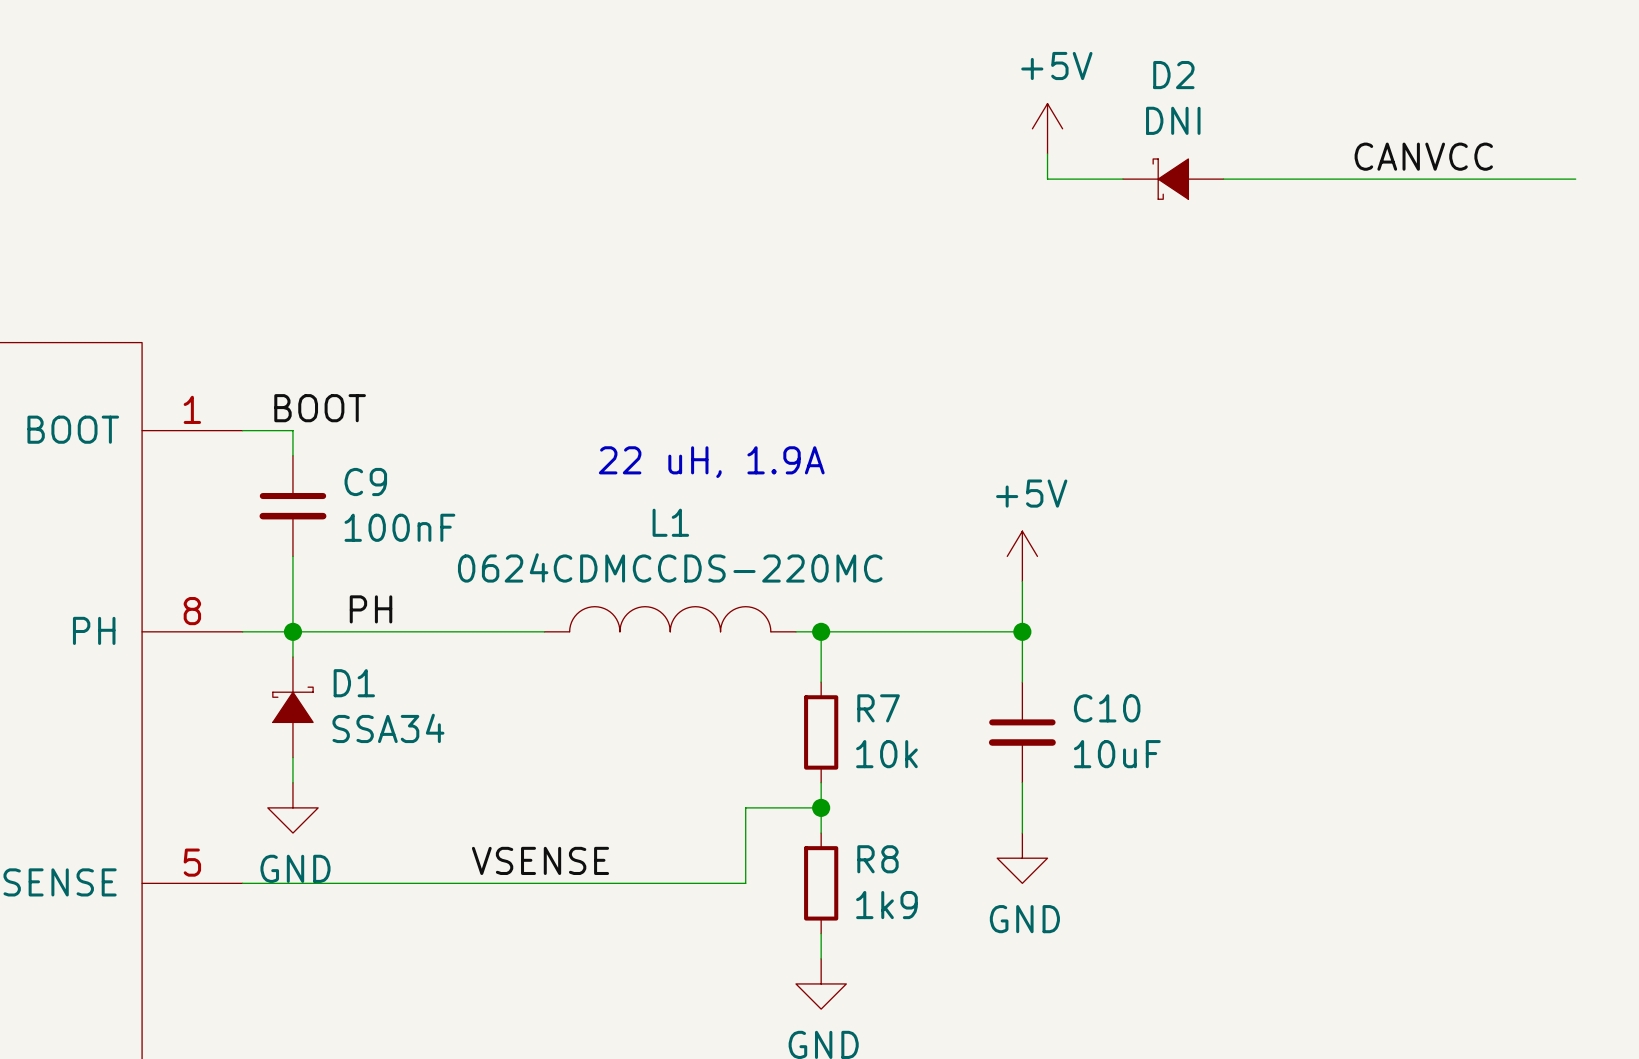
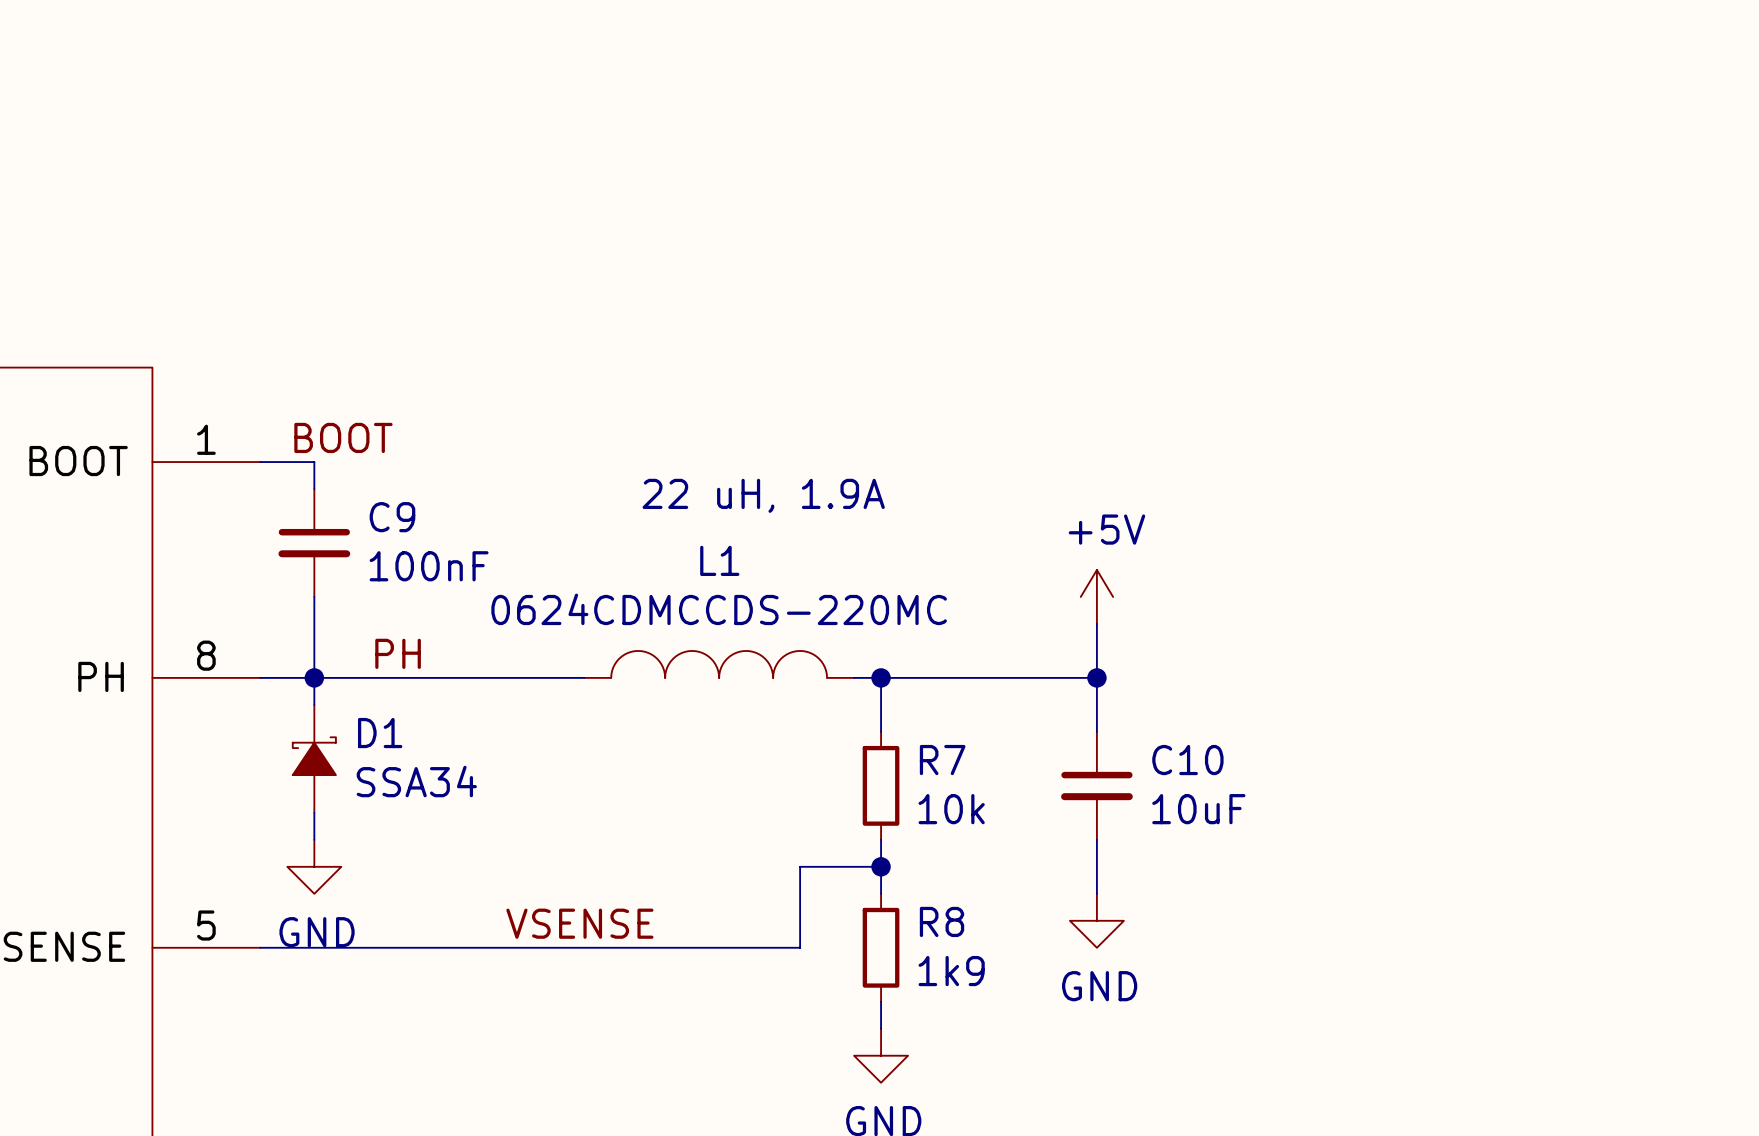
power symbol: +5V (1047, 128) -> none
wire: (1047, 153) (1047, 179) (1122, 179) -> none
label: CANVCC (1423, 156) -> none
D2: DNI (1173, 179) -> none
wire: (1223, 179) (1575, 179) -> none

